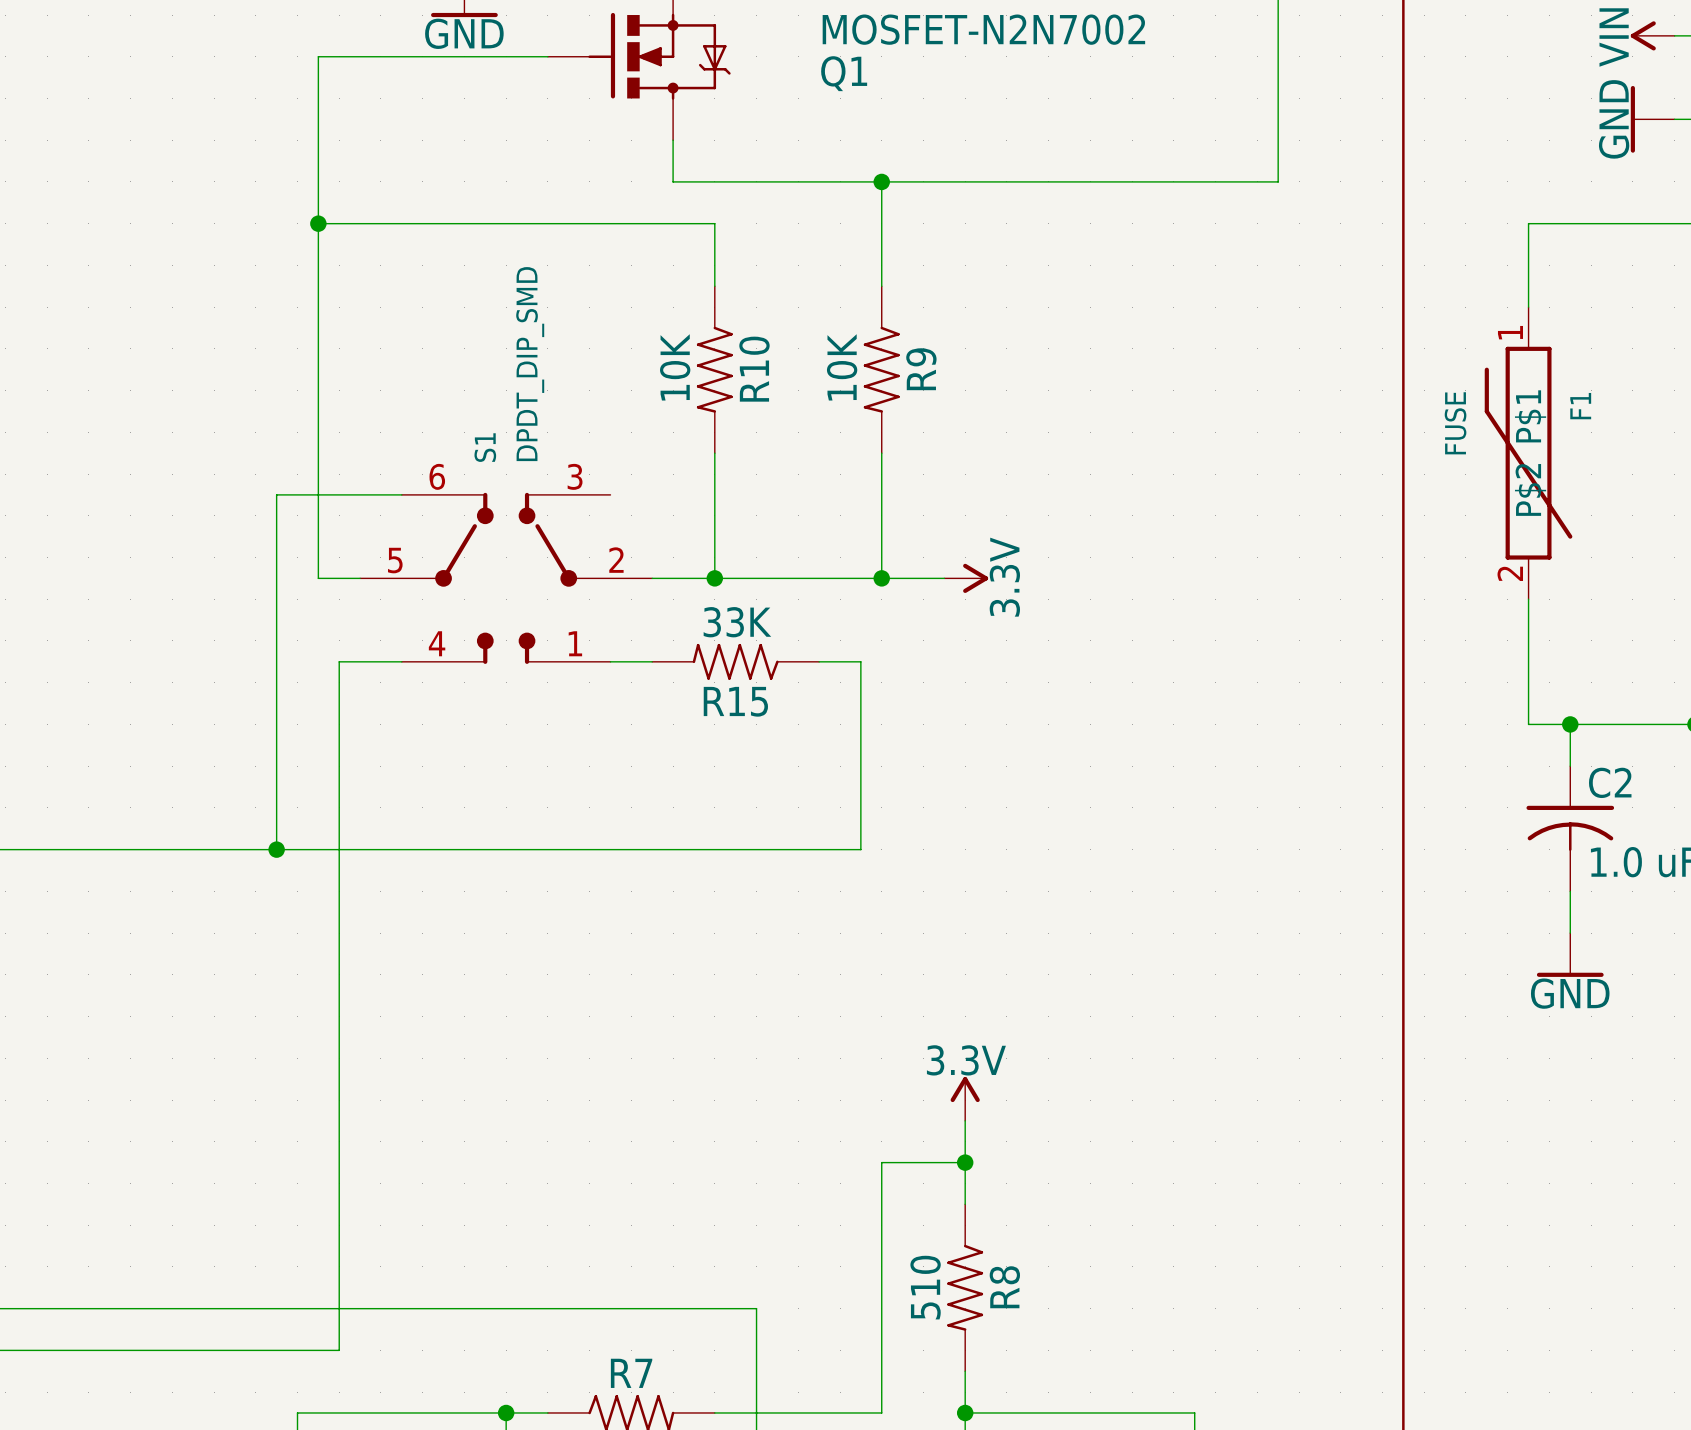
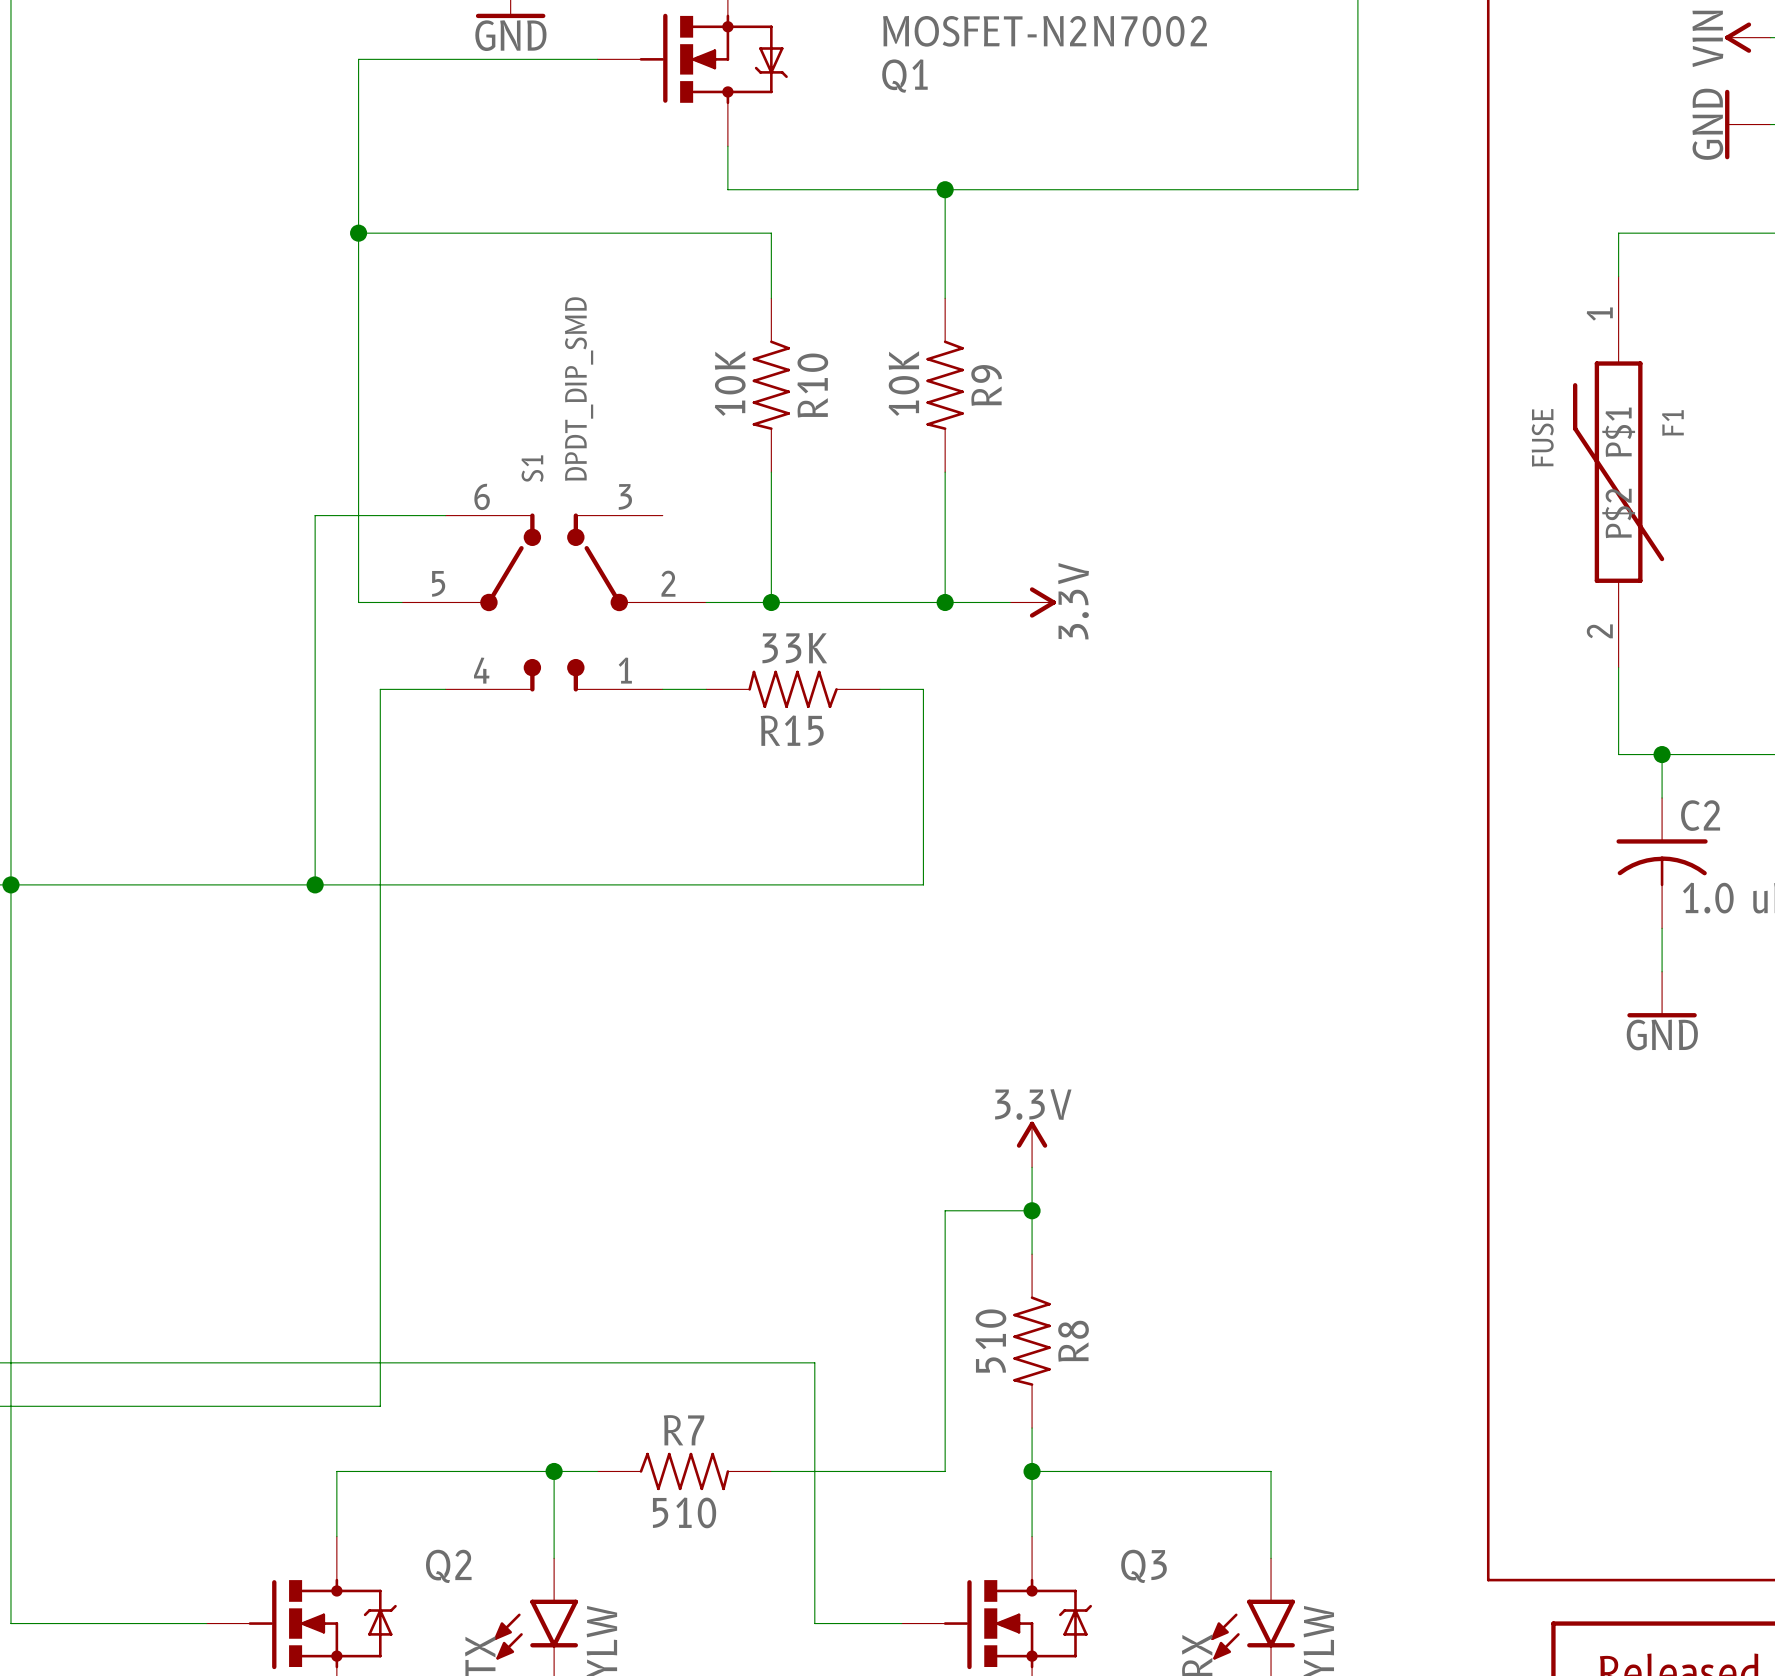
F1 symbol: [1484, 307, 1573, 600] -> [1572, 276, 1665, 668]

